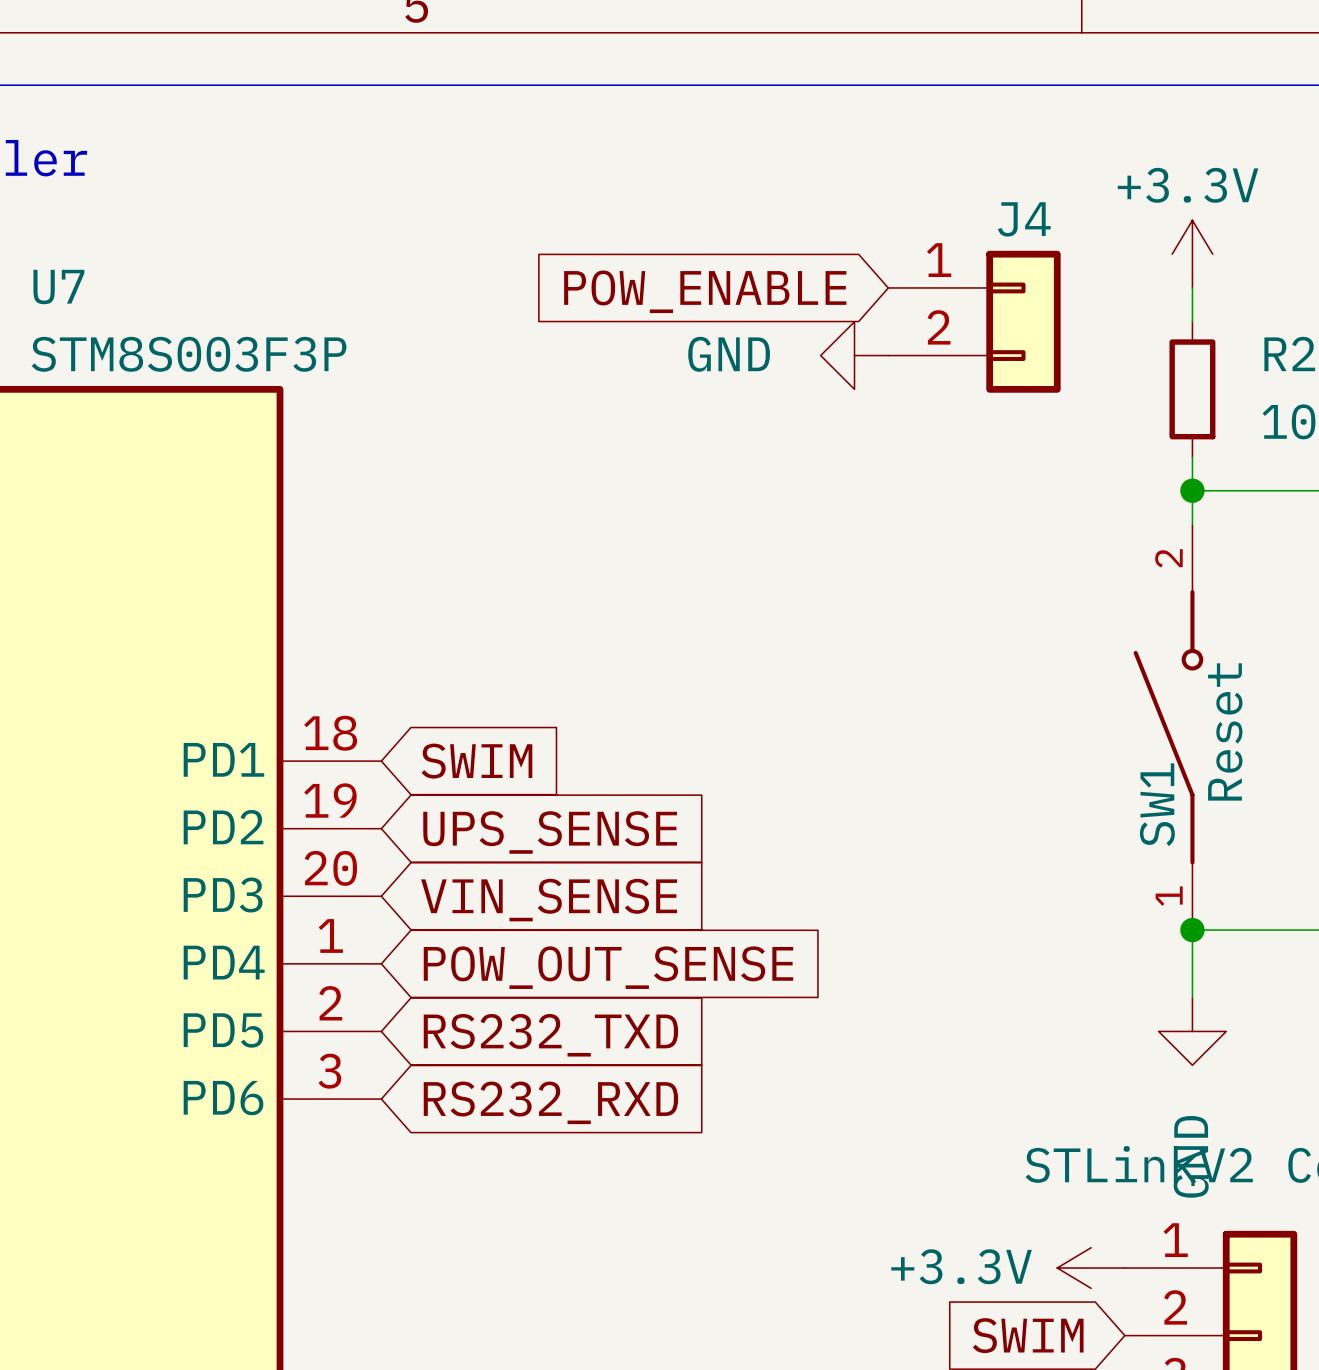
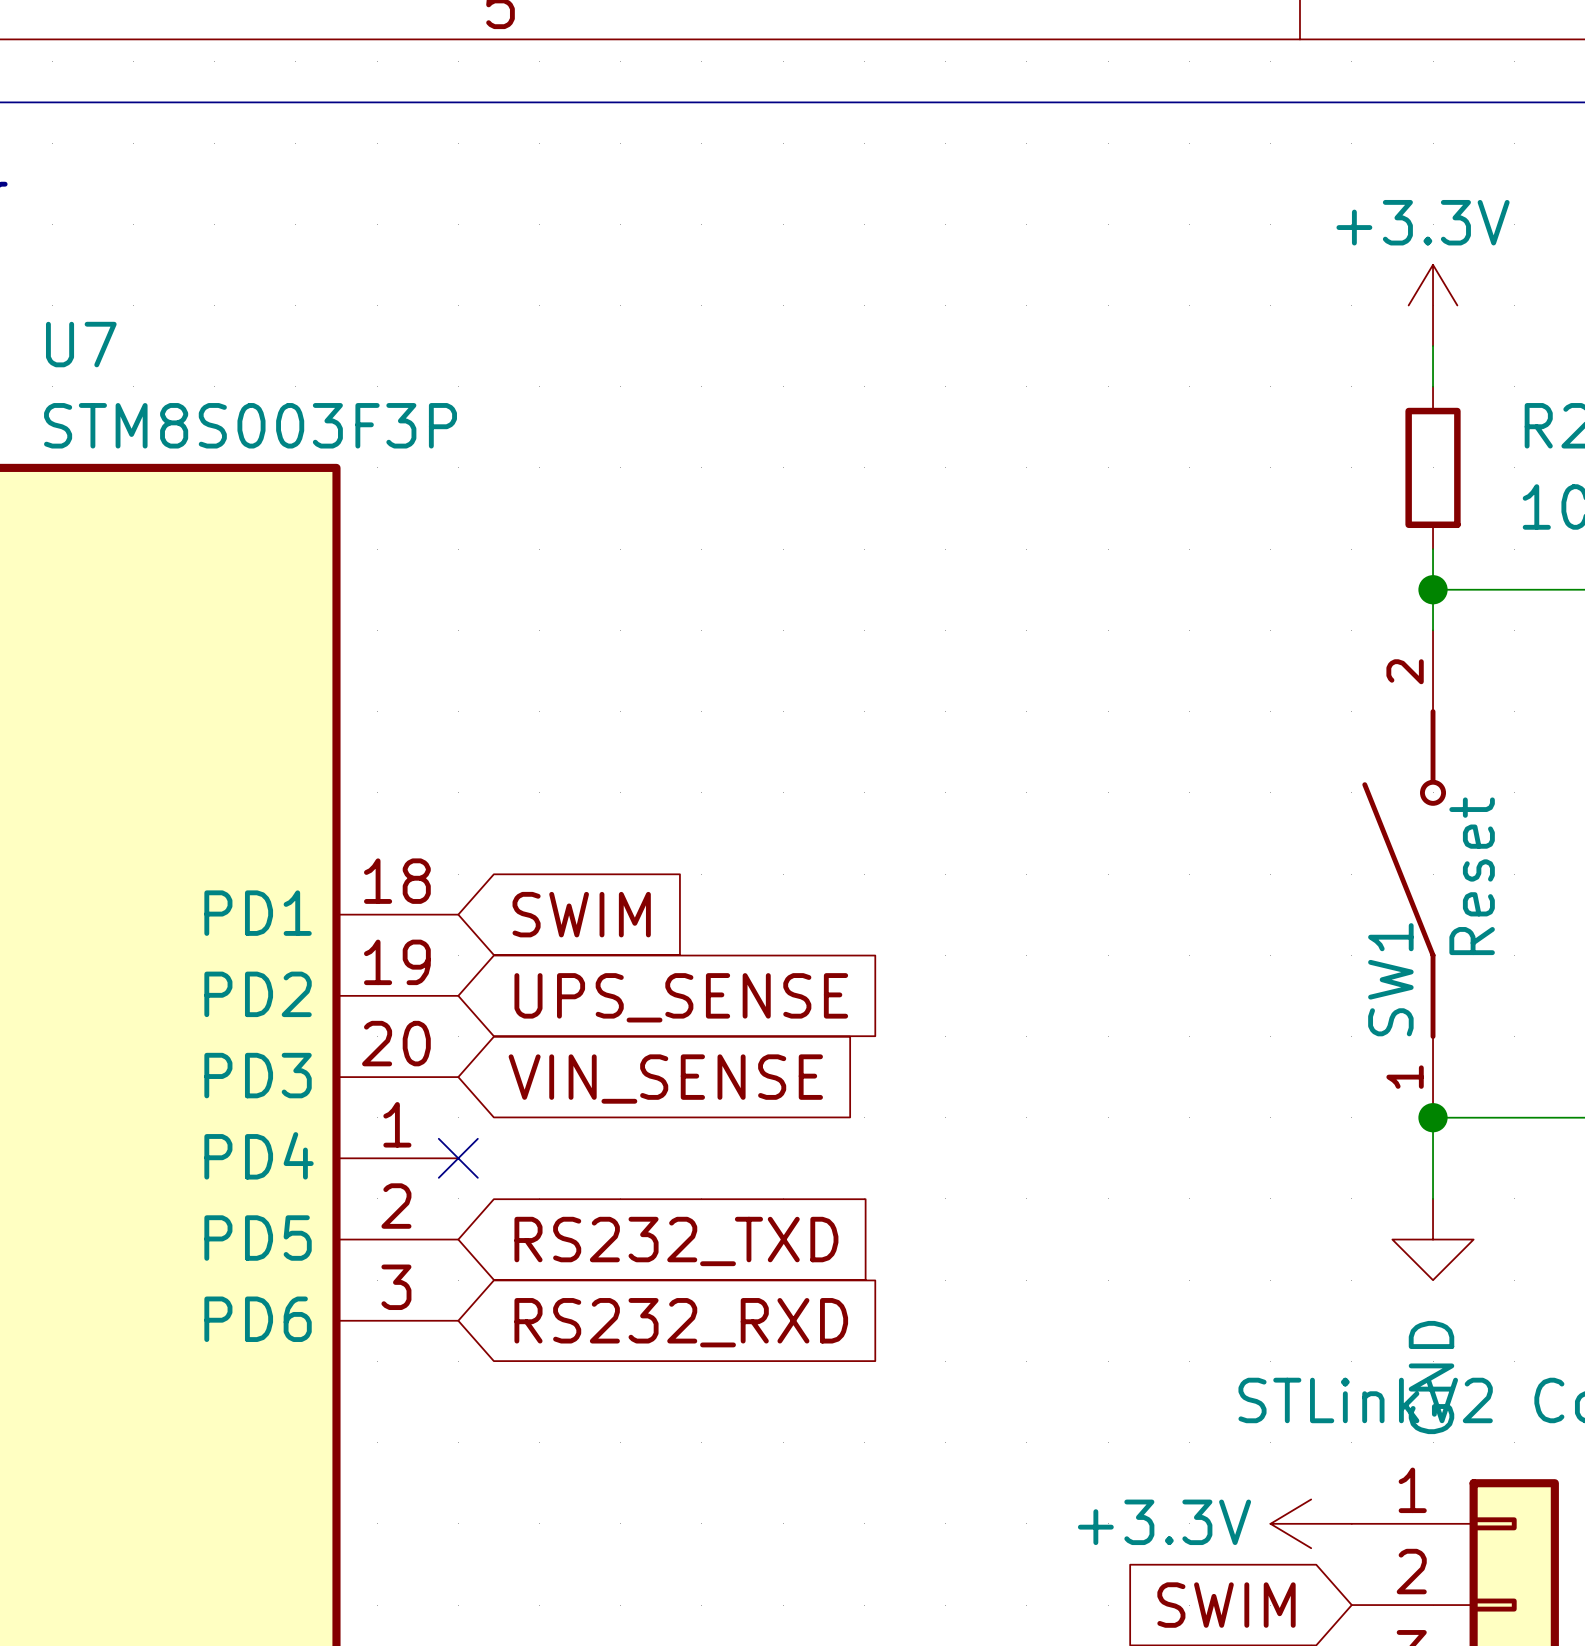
global label: POW_ENABLE (705, 291) -> none
J4: (974, 321) -> none
power symbol: GND (854, 355) -> none
no-connect mark: none -> (458, 1158)
global label: POW_OUT_SENSE (608, 967) -> none

